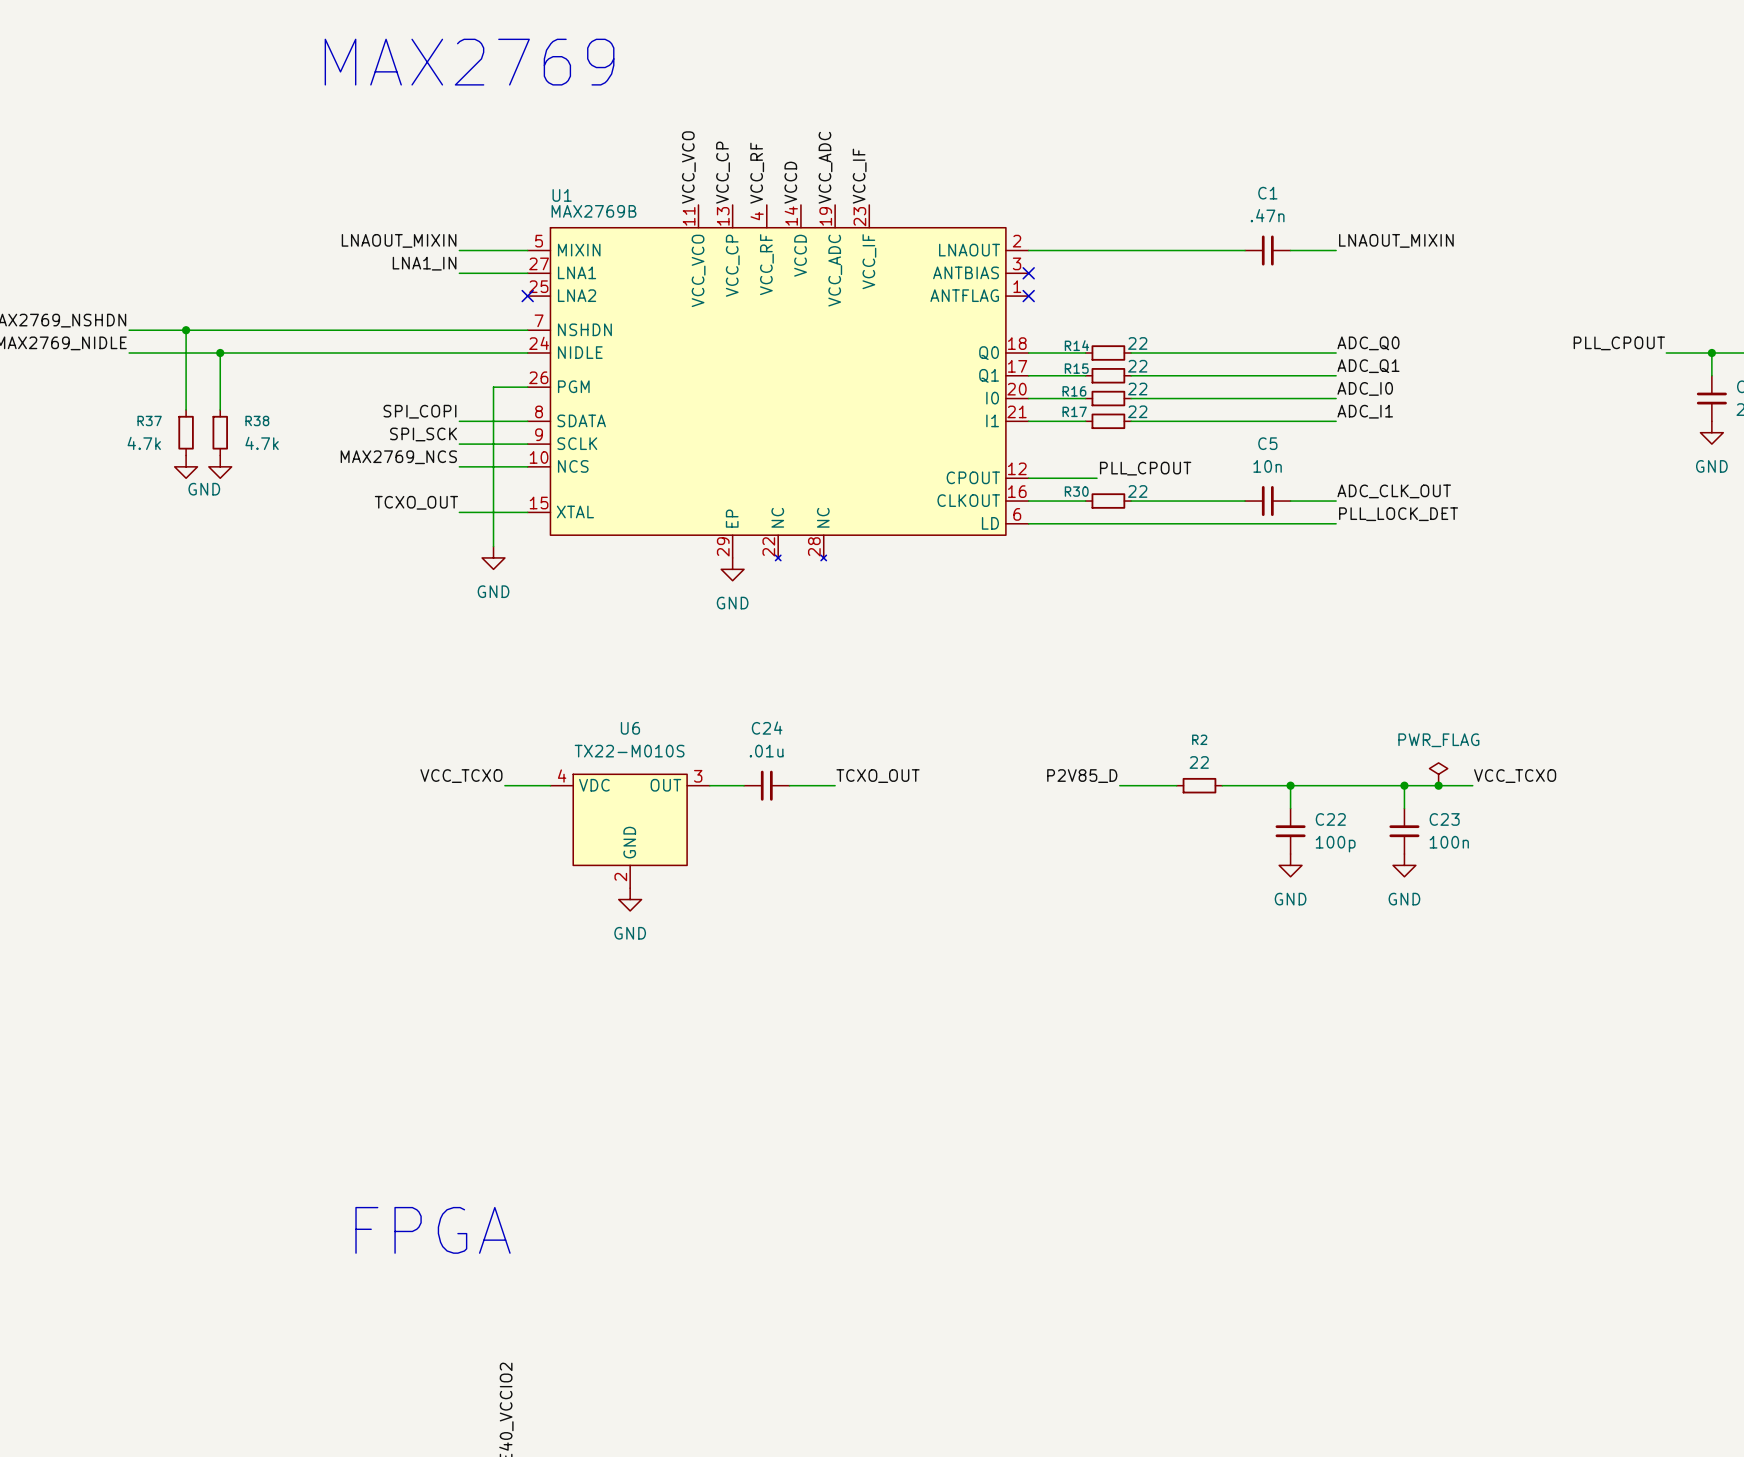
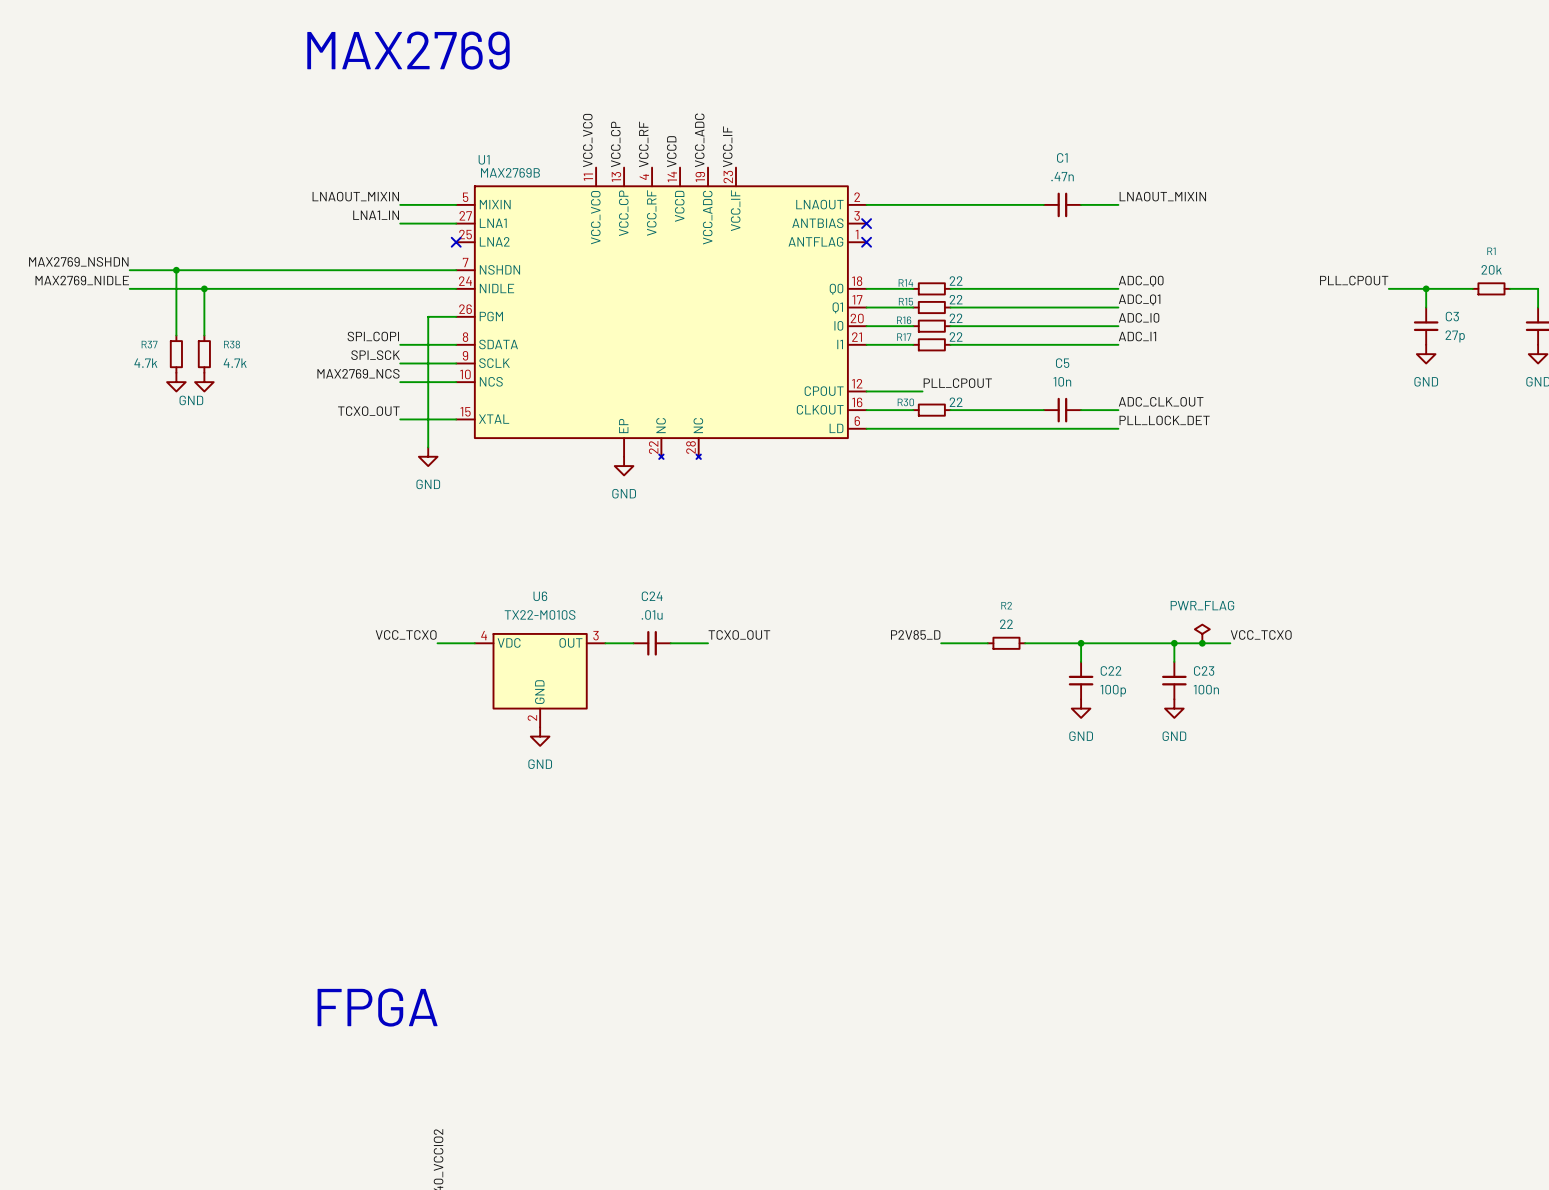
U1 pin number: 29 (723, 546) -> none

